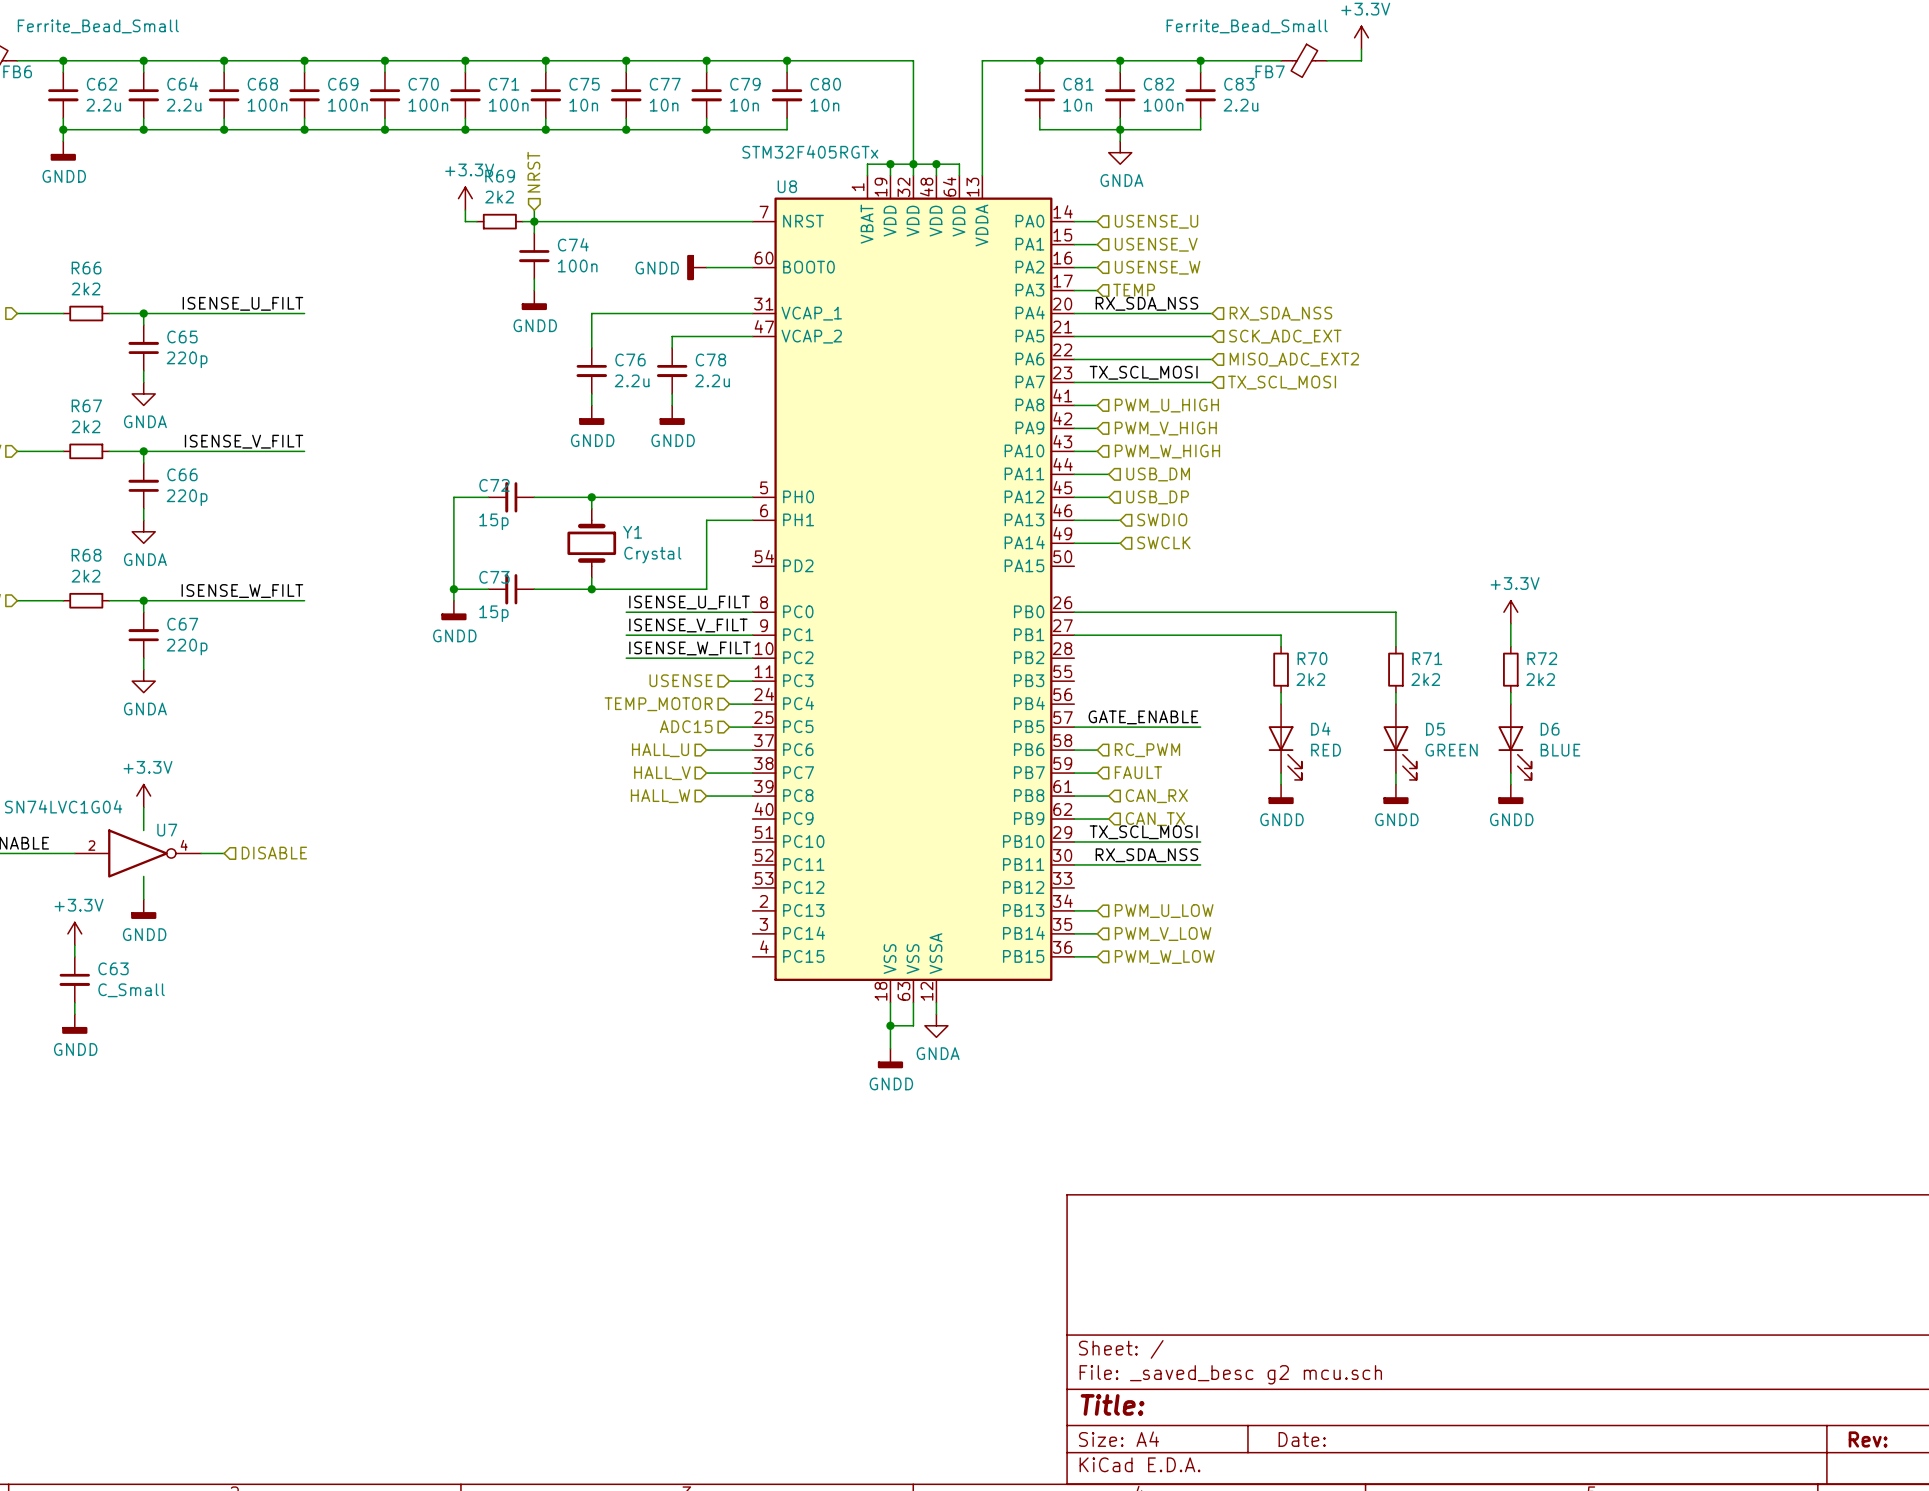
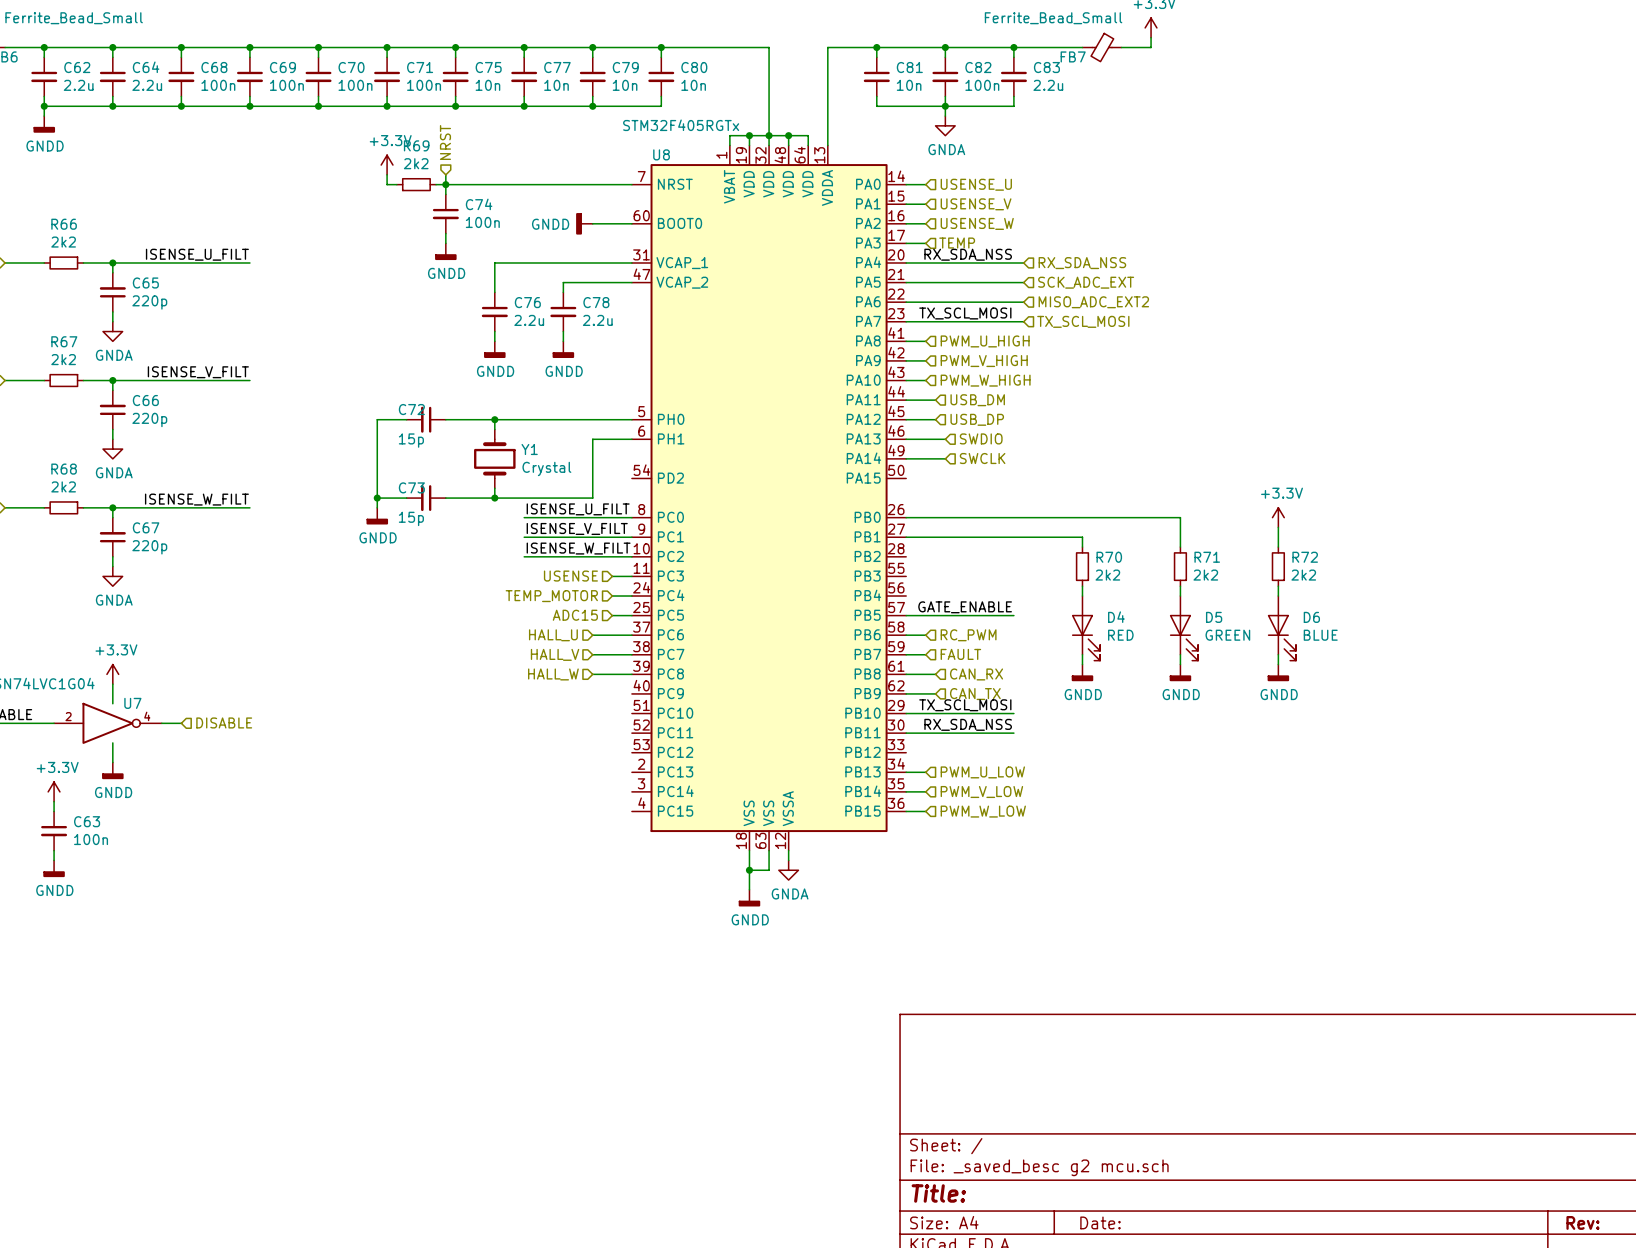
C63 value: C_Small (131, 990) -> 100n (91, 839)

